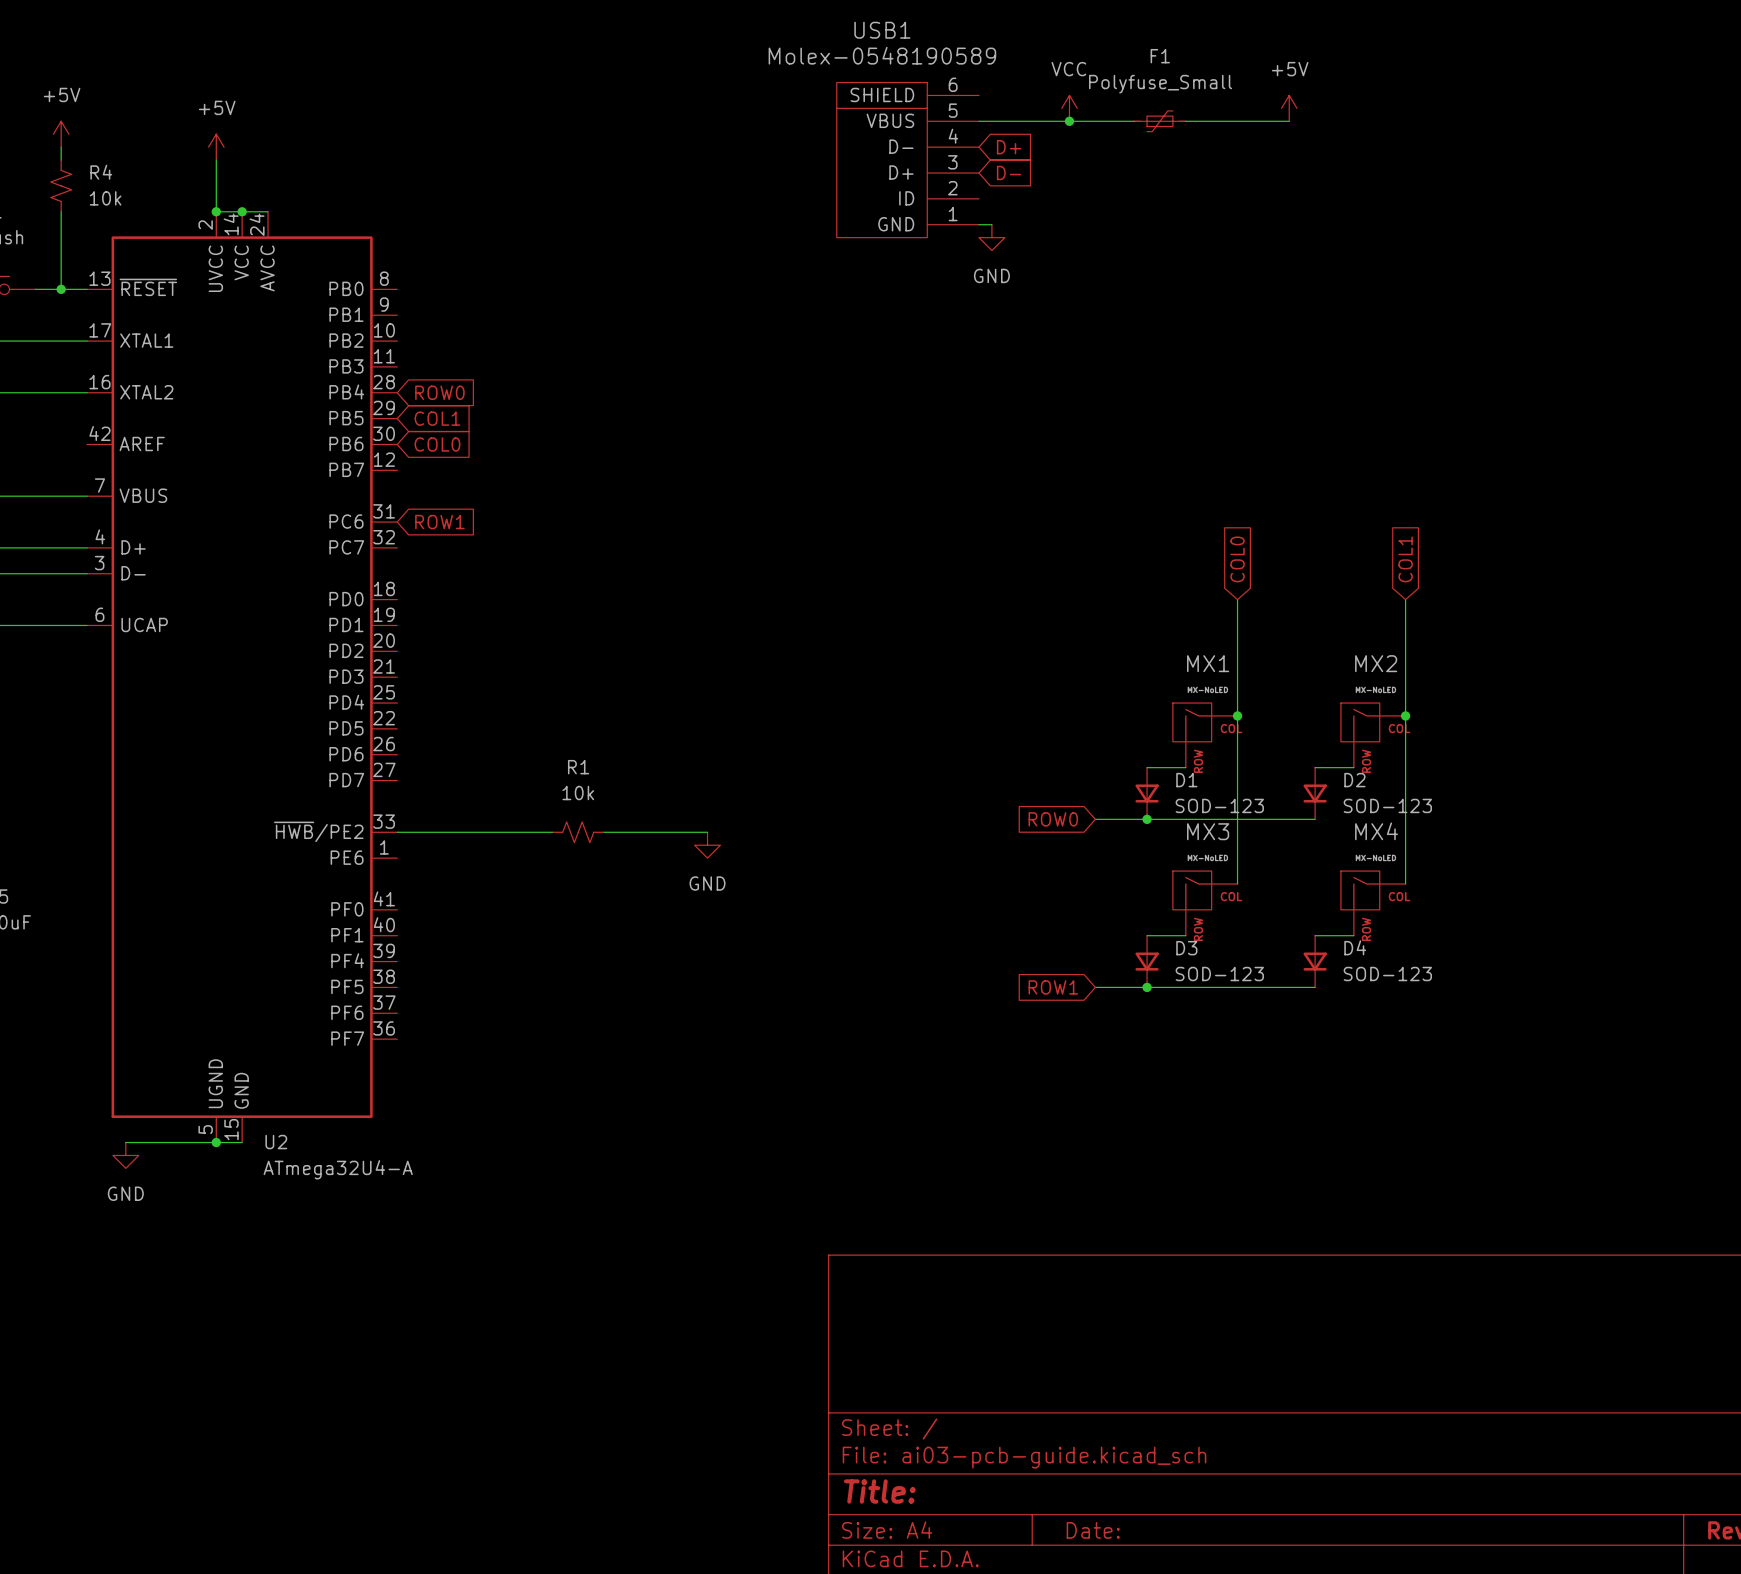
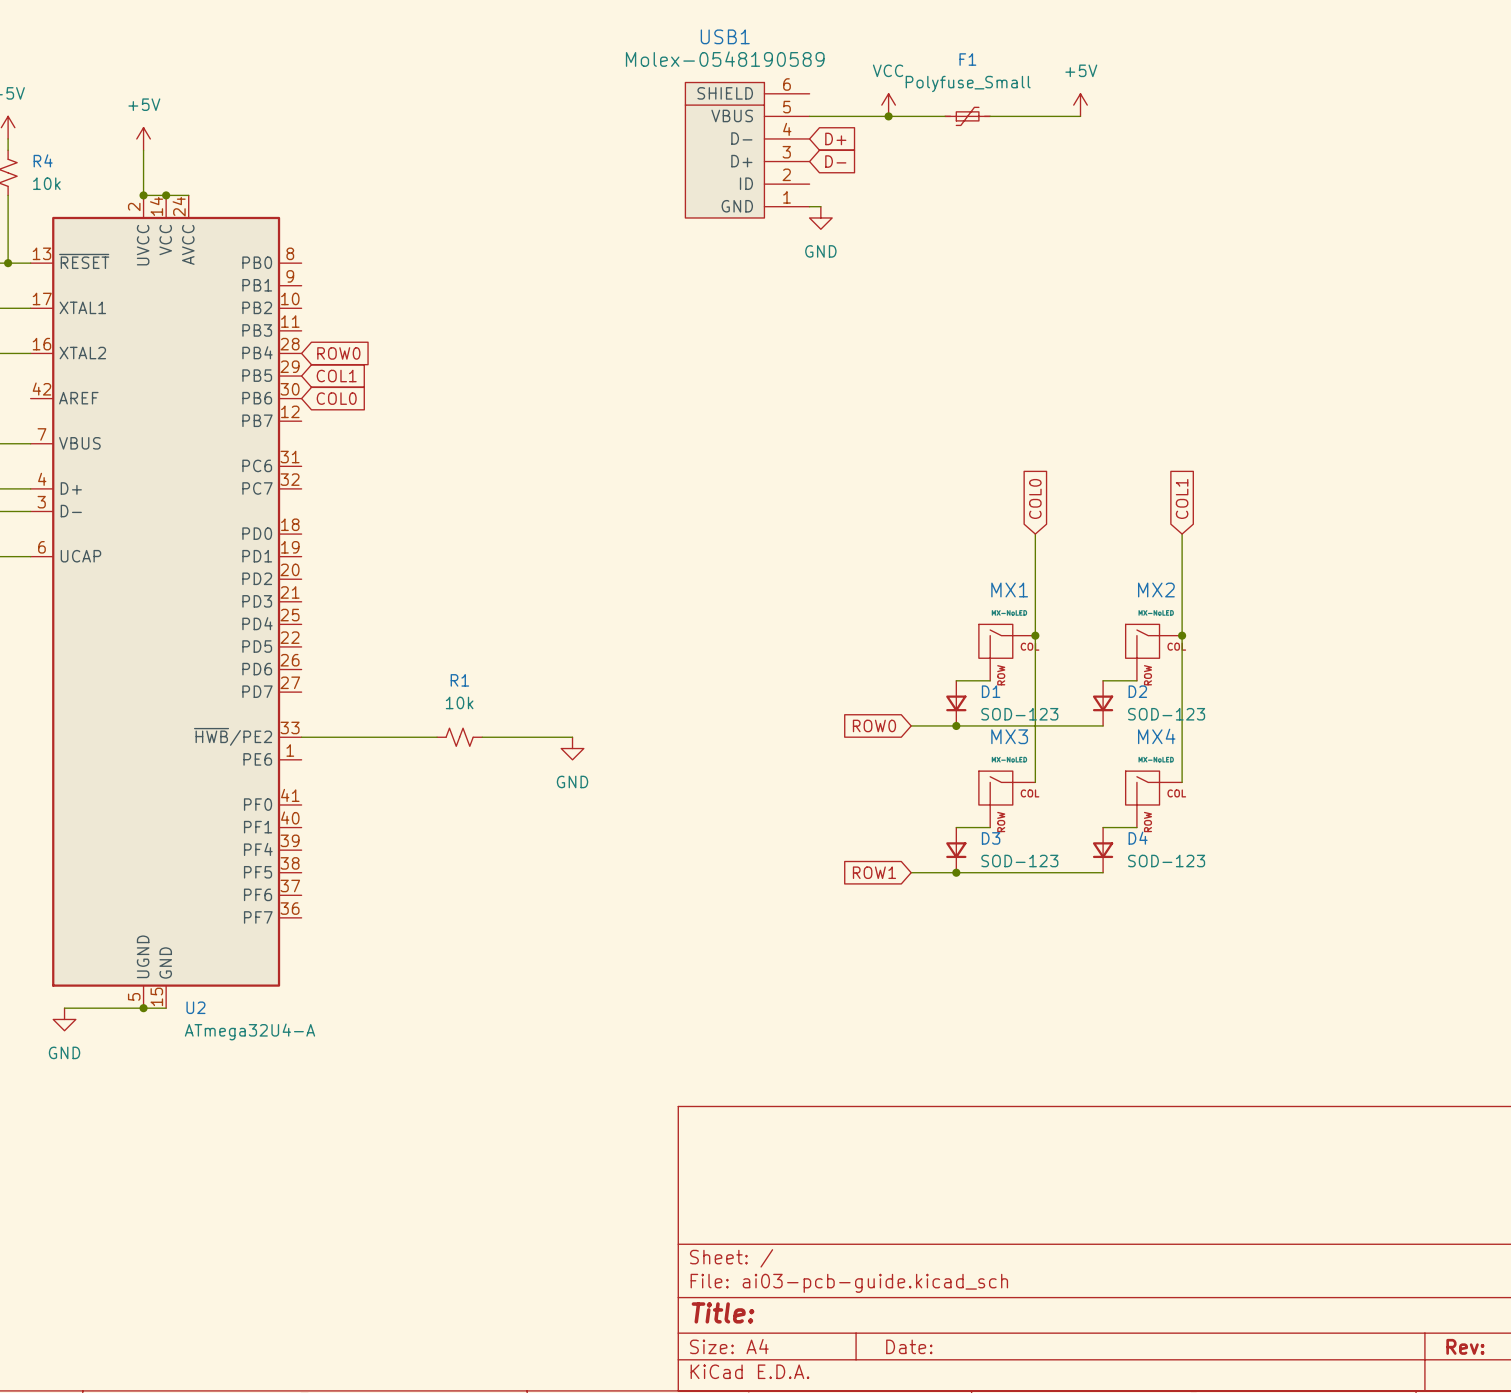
global label: ROW1 (439, 522) -> none

